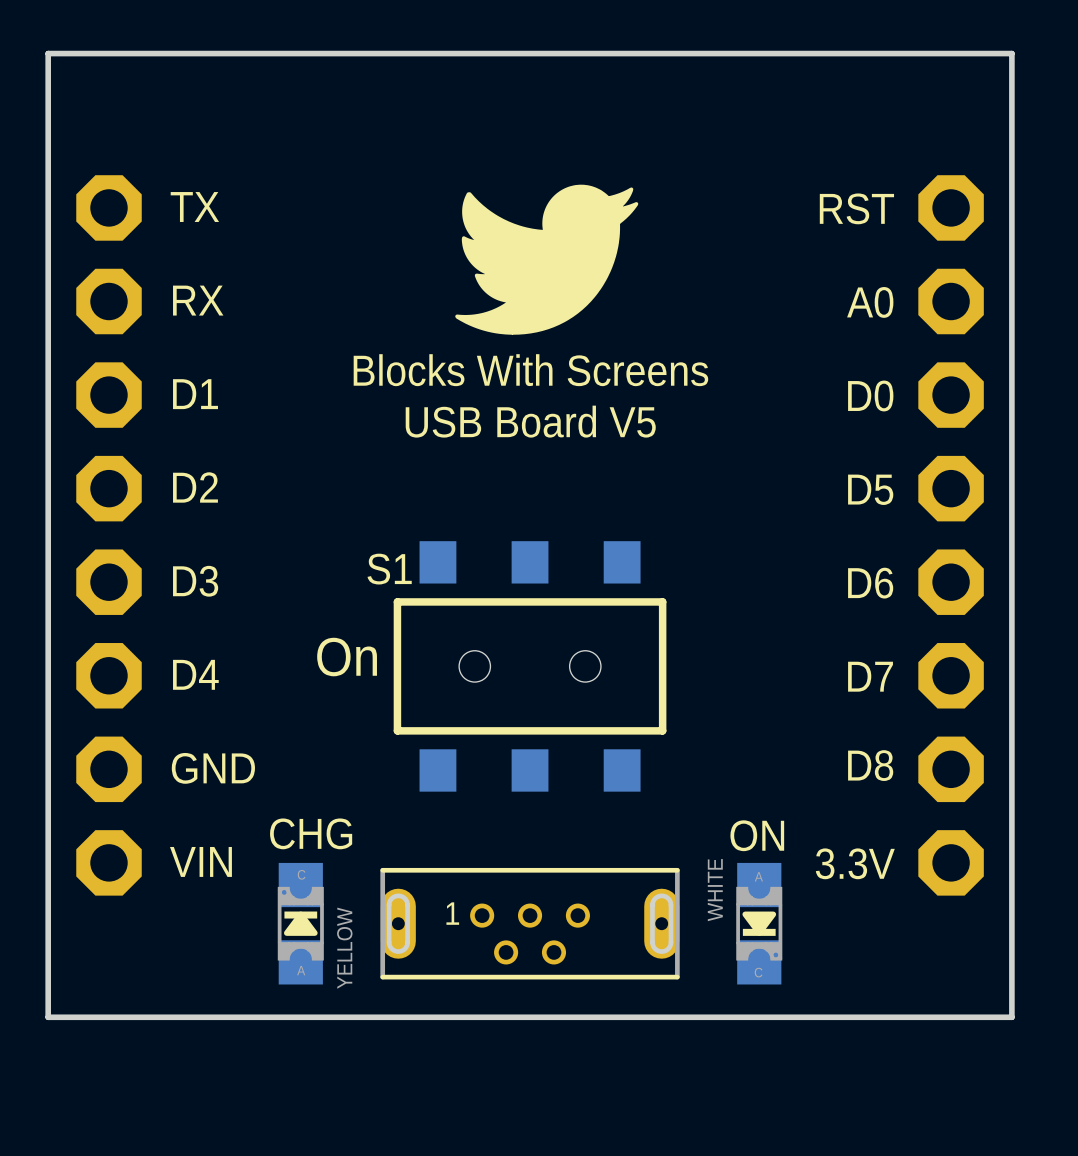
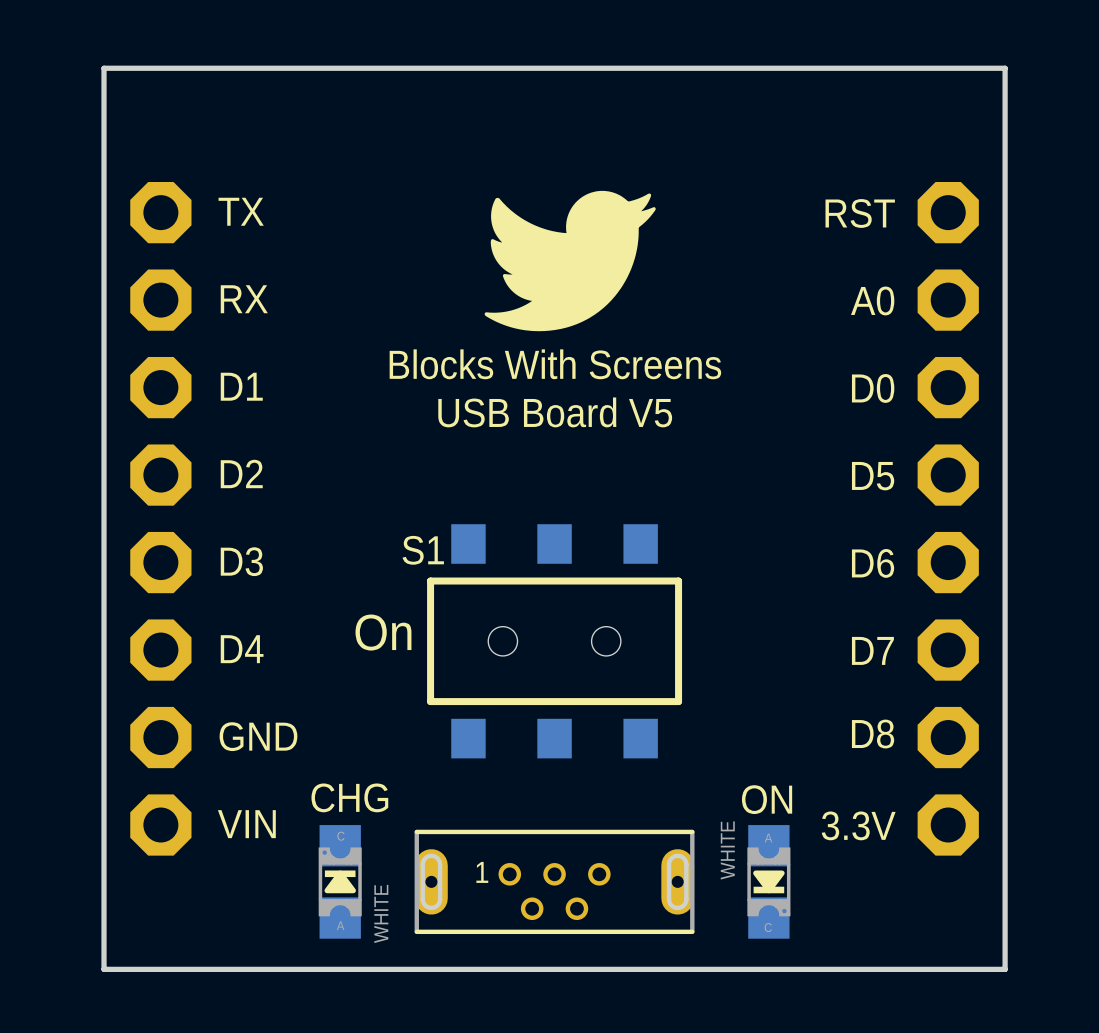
CHG value: YELLOW (344, 948) -> WHITE (381, 913)

